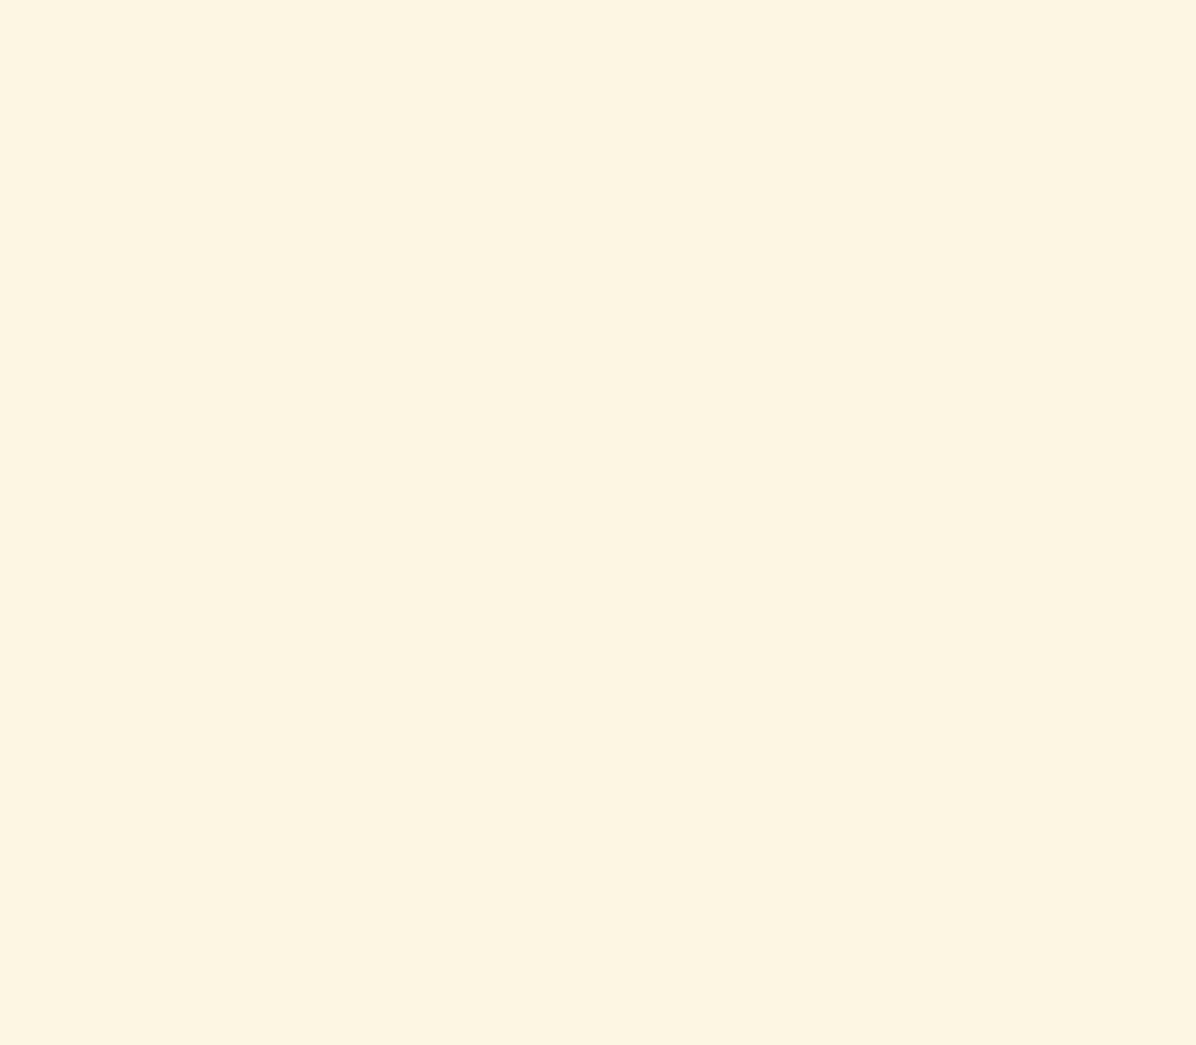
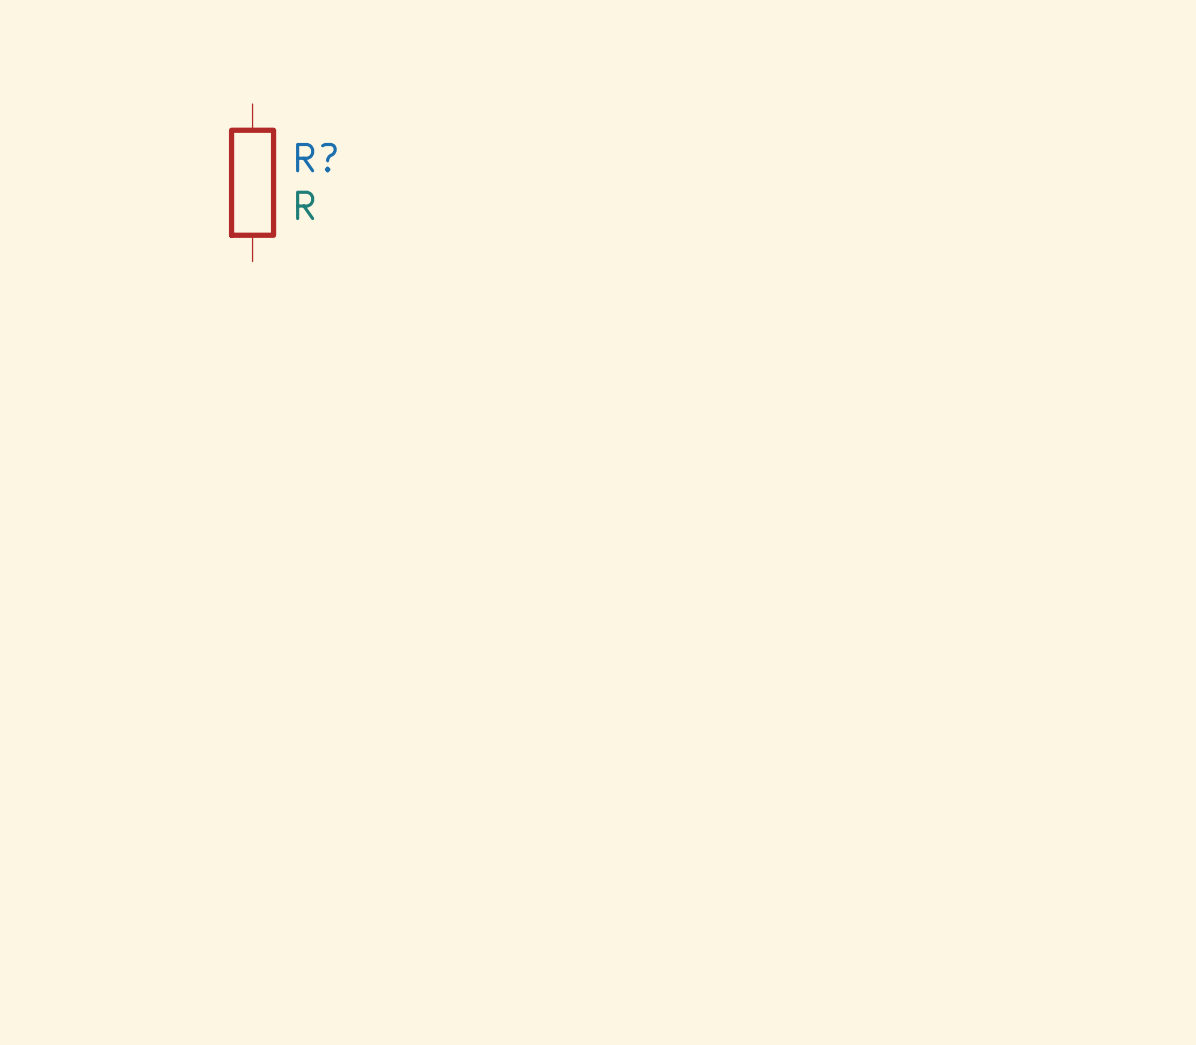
R?: none -> R (252, 182)

